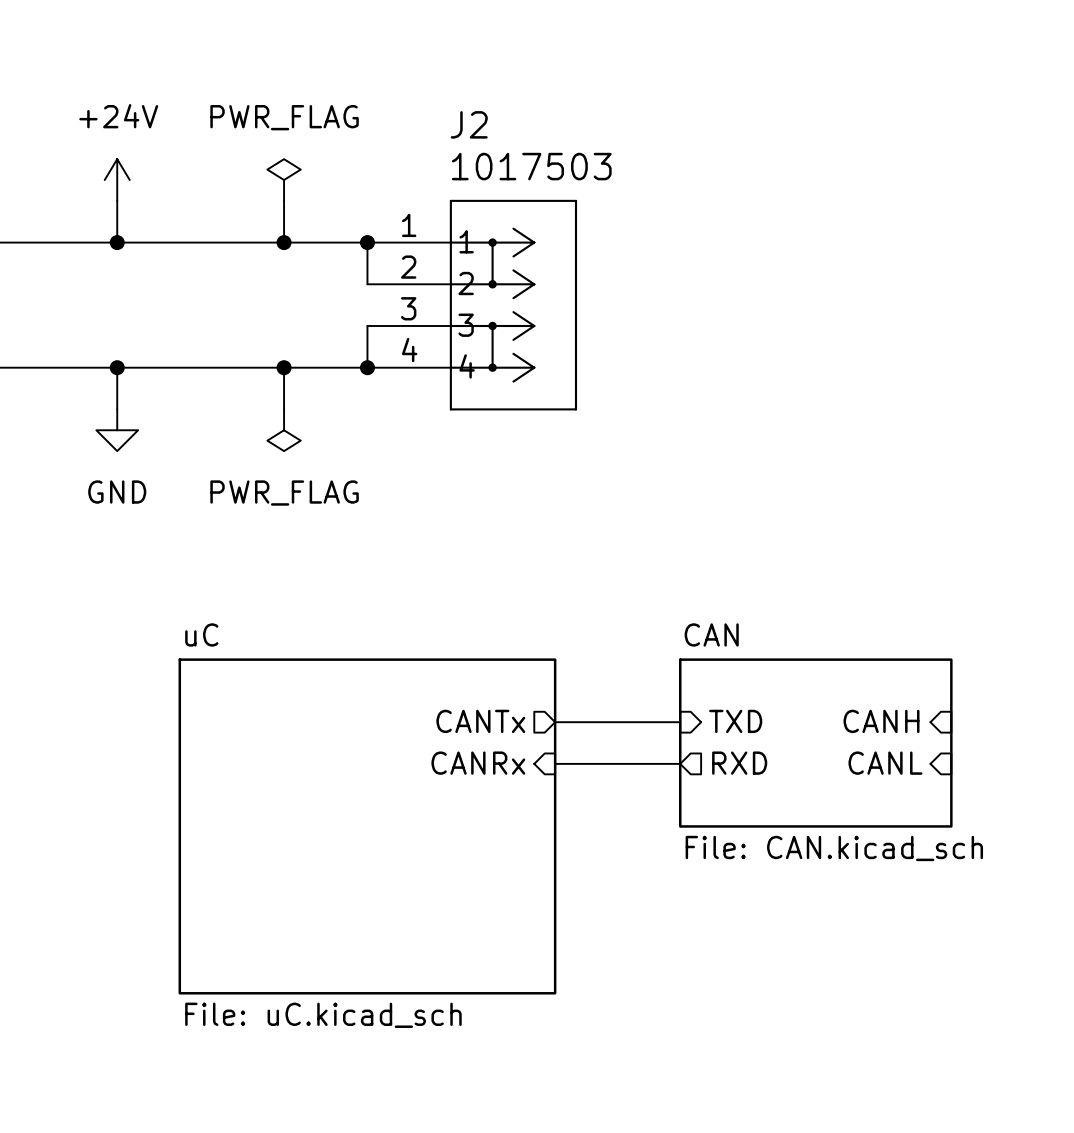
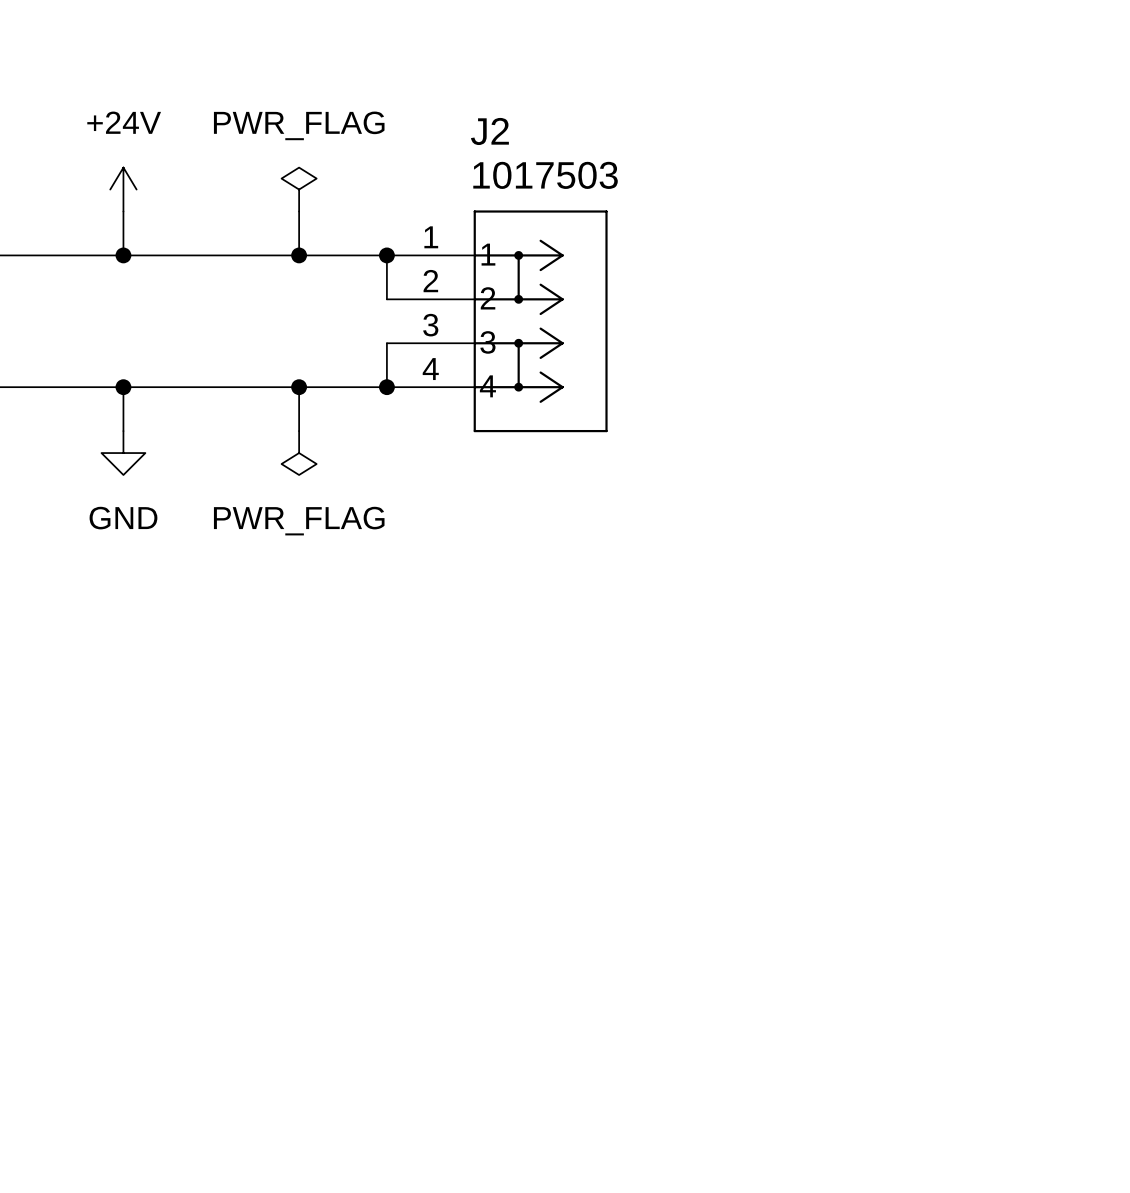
sheet pin: CANTx (480, 721) -> none
sheet pin: TXD (735, 721) -> none
sheet pin: CANH (881, 721) -> none
wire: (555, 722) (680, 722) -> none
sheet CAN: File: CAN.kicad_sch (815, 743) -> none
sheet pin: CANRx (478, 763) -> none
wire: (555, 763) (680, 763) -> none
sheet pin: RXD (739, 763) -> none
sheet pin: CANL (885, 763) -> none
sheet uC: File: uC.kicad_sch (367, 826) -> none

